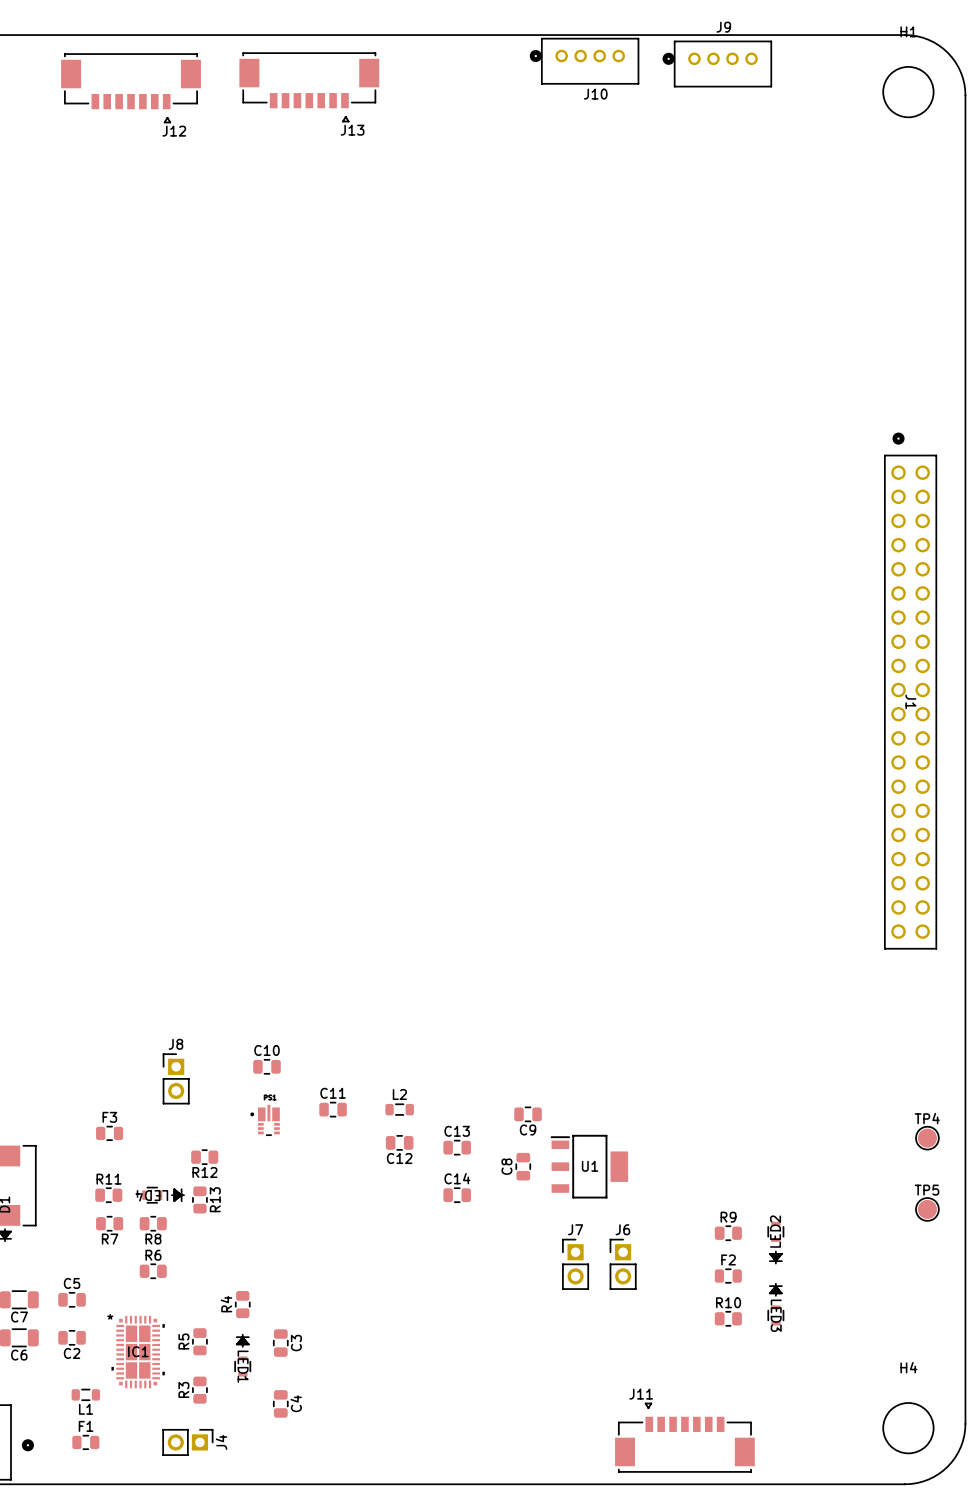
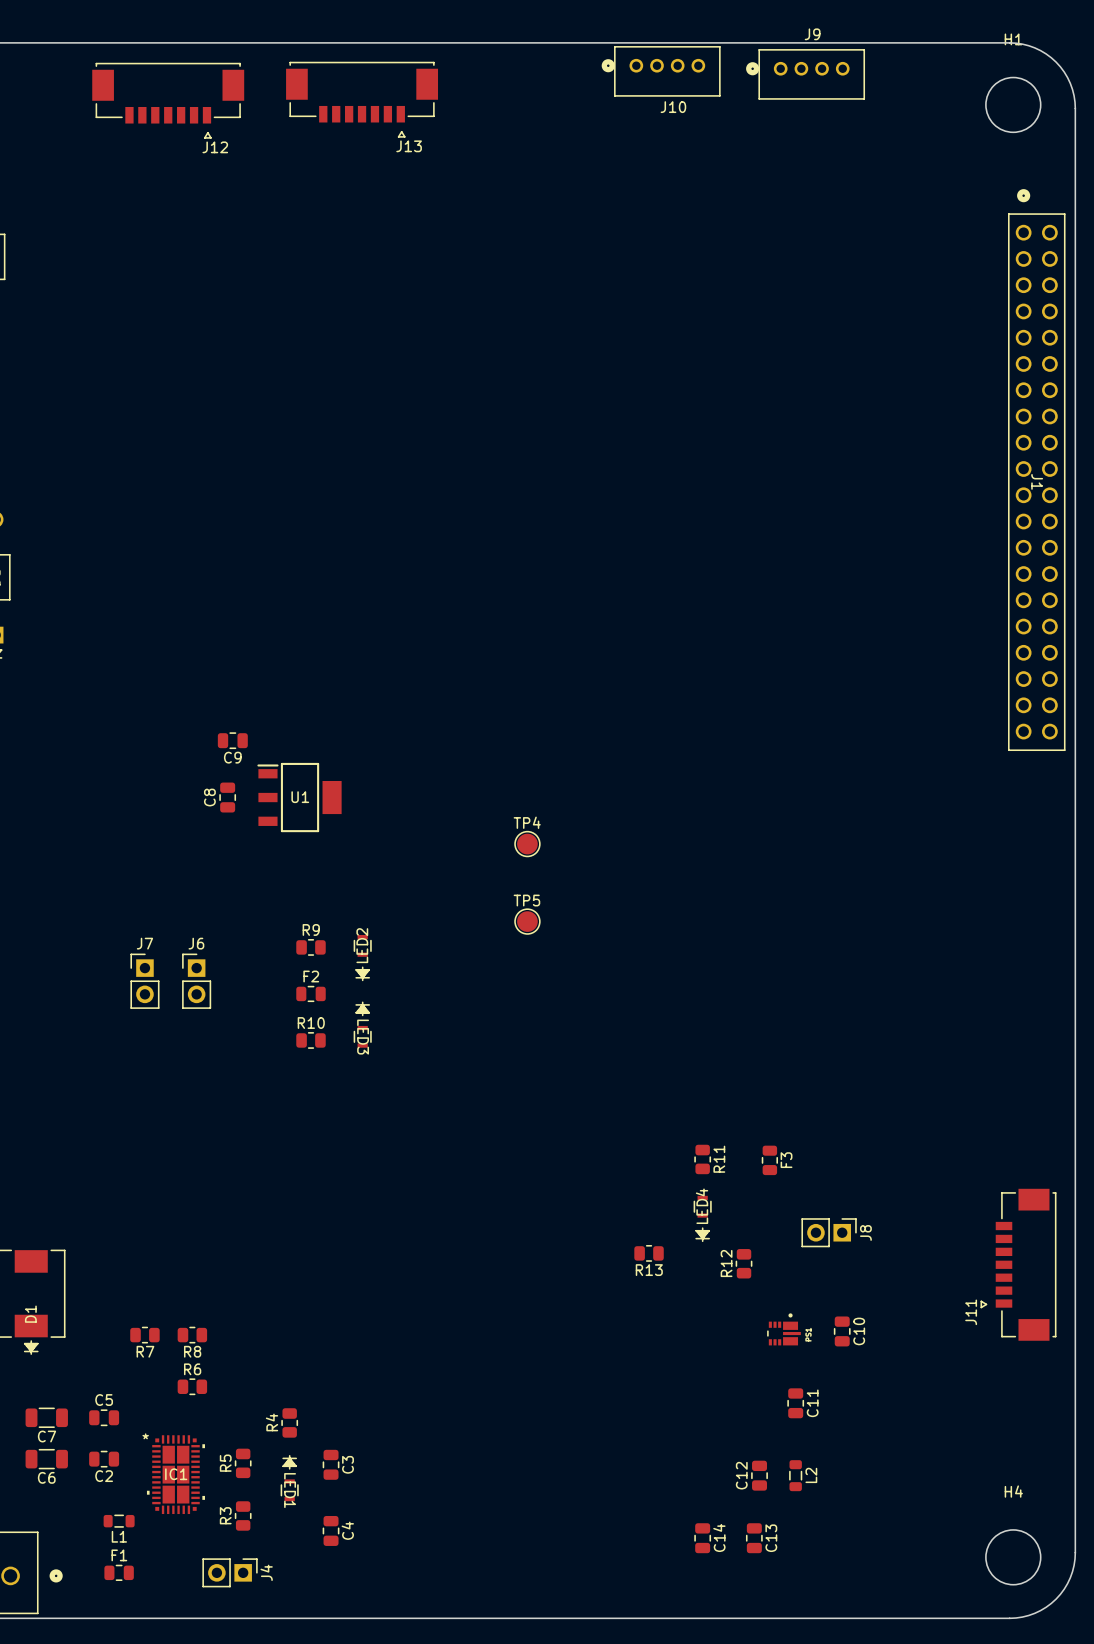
J1 position: (910, 691) -> (1036, 470)
C10 rotation: 0° (266, 1066) -> 90° clockwise (842, 1331)
C10 position: (266, 1066) -> (842, 1331)
J8 rotation: 0° (176, 1078) -> 90° clockwise (829, 1232)
J8 position: (176, 1078) -> (829, 1232)
C11 rotation: 0° (333, 1109) -> 90° clockwise (795, 1403)
C11 position: (333, 1109) -> (795, 1403)
L2 rotation: 0° (399, 1109) -> 90° clockwise (795, 1475)
L2 position: (399, 1109) -> (795, 1475)
C9 position: (528, 1114) -> (232, 740)
part rotation: 0° (265, 1120) -> 90° clockwise (784, 1329)
part position: (265, 1120) -> (784, 1329)
F3 rotation: 0° (109, 1133) -> 90° clockwise (769, 1160)
F3 position: (109, 1133) -> (769, 1160)
TP4 position: (927, 1138) -> (527, 844)
C12 rotation: 0° (399, 1142) -> 90° clockwise (759, 1475)
C12 position: (399, 1142) -> (759, 1475)
C13 rotation: 0° (457, 1147) -> 90° clockwise (754, 1538)
C13 position: (457, 1147) -> (754, 1538)
R12 rotation: 0° (204, 1157) -> 90° clockwise (744, 1263)
R12 position: (204, 1157) -> (744, 1263)
C8 position: (523, 1166) -> (227, 797)
U1 position: (589, 1166) -> (299, 797)
R11 rotation: 0° (108, 1195) -> 90° clockwise (702, 1159)
R11 position: (108, 1195) -> (702, 1159)
LED4 rotation: 0° (163, 1195) -> 90° clockwise (702, 1218)
LED4 position: (163, 1195) -> (702, 1218)
C14 rotation: 0° (457, 1195) -> 90° clockwise (702, 1538)
C14 position: (457, 1195) -> (702, 1538)
R13 rotation: 0° (199, 1199) -> 90° clockwise (649, 1253)
R13 position: (199, 1199) -> (649, 1253)
TP5 position: (927, 1209) -> (527, 921)
R9 position: (728, 1233) -> (311, 947)
LED2 position: (775, 1243) -> (362, 958)
J7 position: (575, 1264) -> (144, 981)
J6 position: (623, 1264) -> (196, 981)
F2 position: (728, 1276) -> (311, 993)
LED3 position: (775, 1304) -> (362, 1024)
R10 position: (728, 1318) -> (311, 1040)
J11 rotation: 0° (684, 1437) -> 90° counterclockwise (1018, 1264)
J11 position: (684, 1437) -> (1018, 1264)

